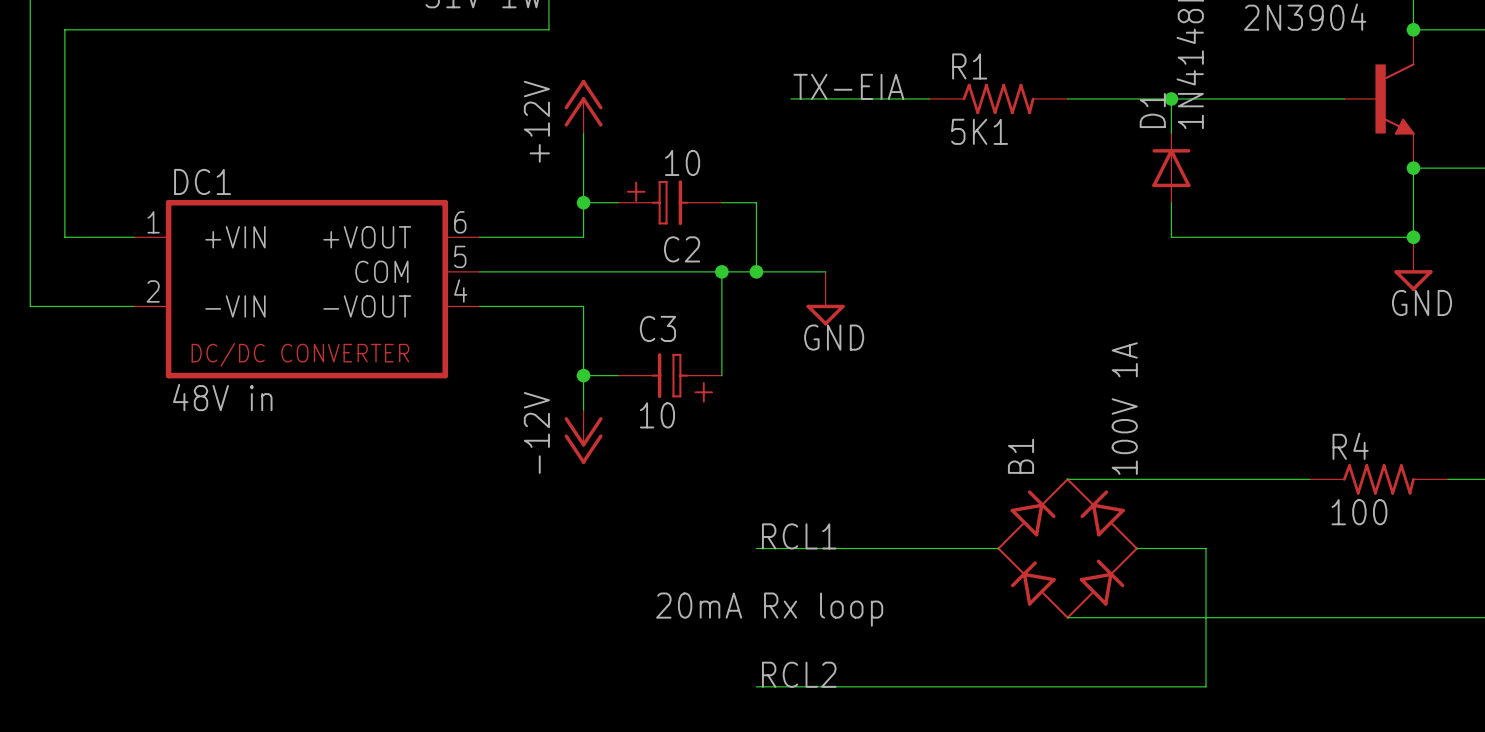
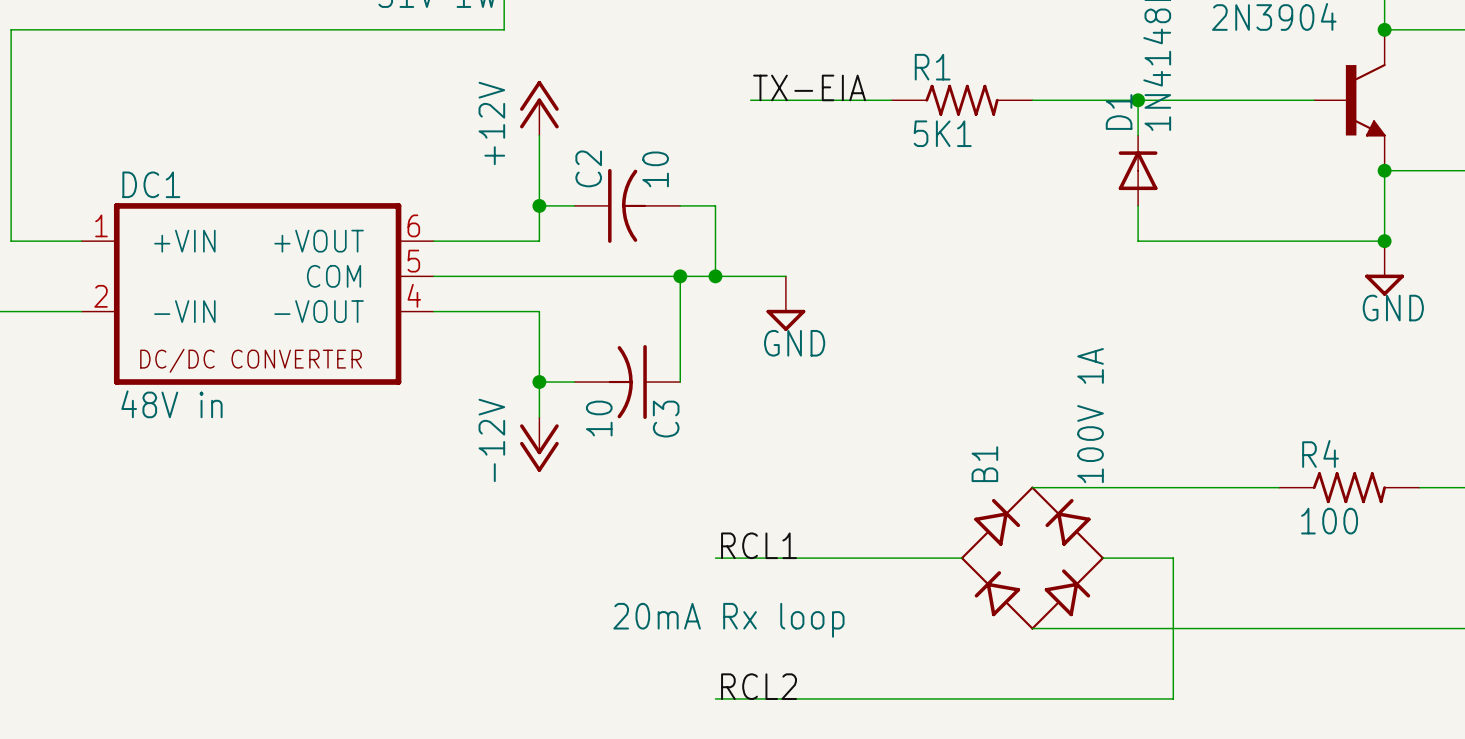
C2 symbol: [618, 180, 722, 226] -> [574, 168, 681, 243]
C2 name position: C2 (682, 249) -> C2 (588, 168)
C3 name position: C3 (657, 328) -> C3 (666, 419)
C3 symbol: [618, 353, 722, 399] -> [574, 345, 681, 419]

